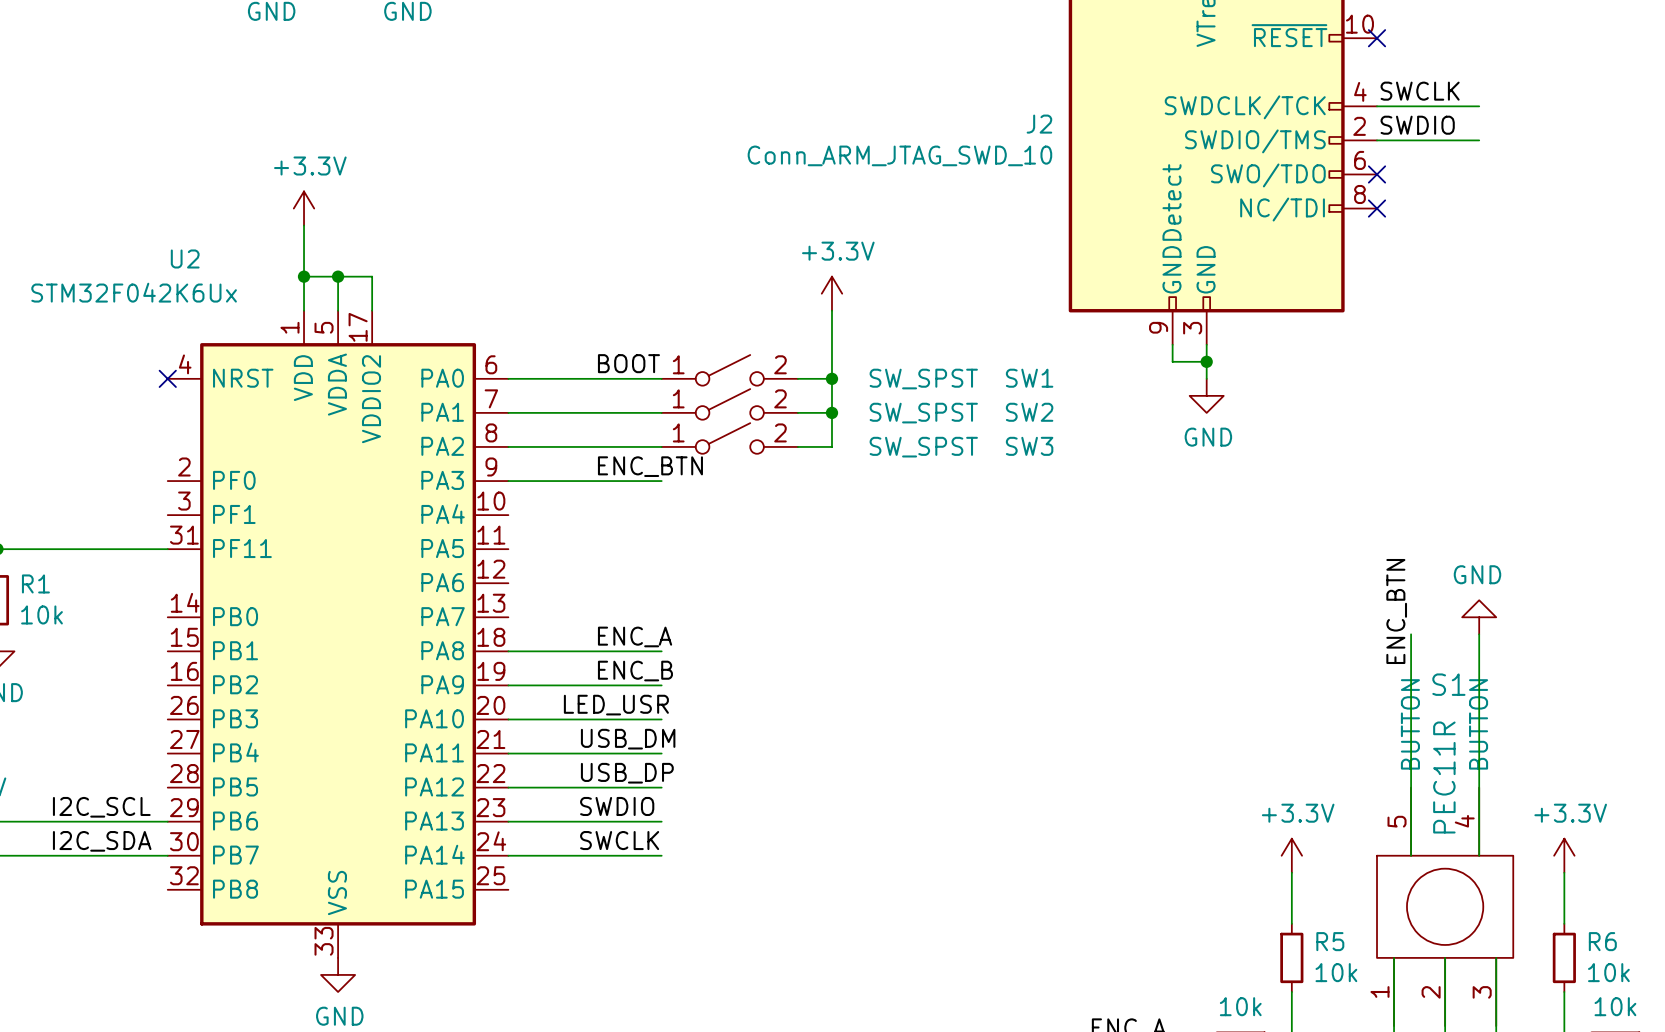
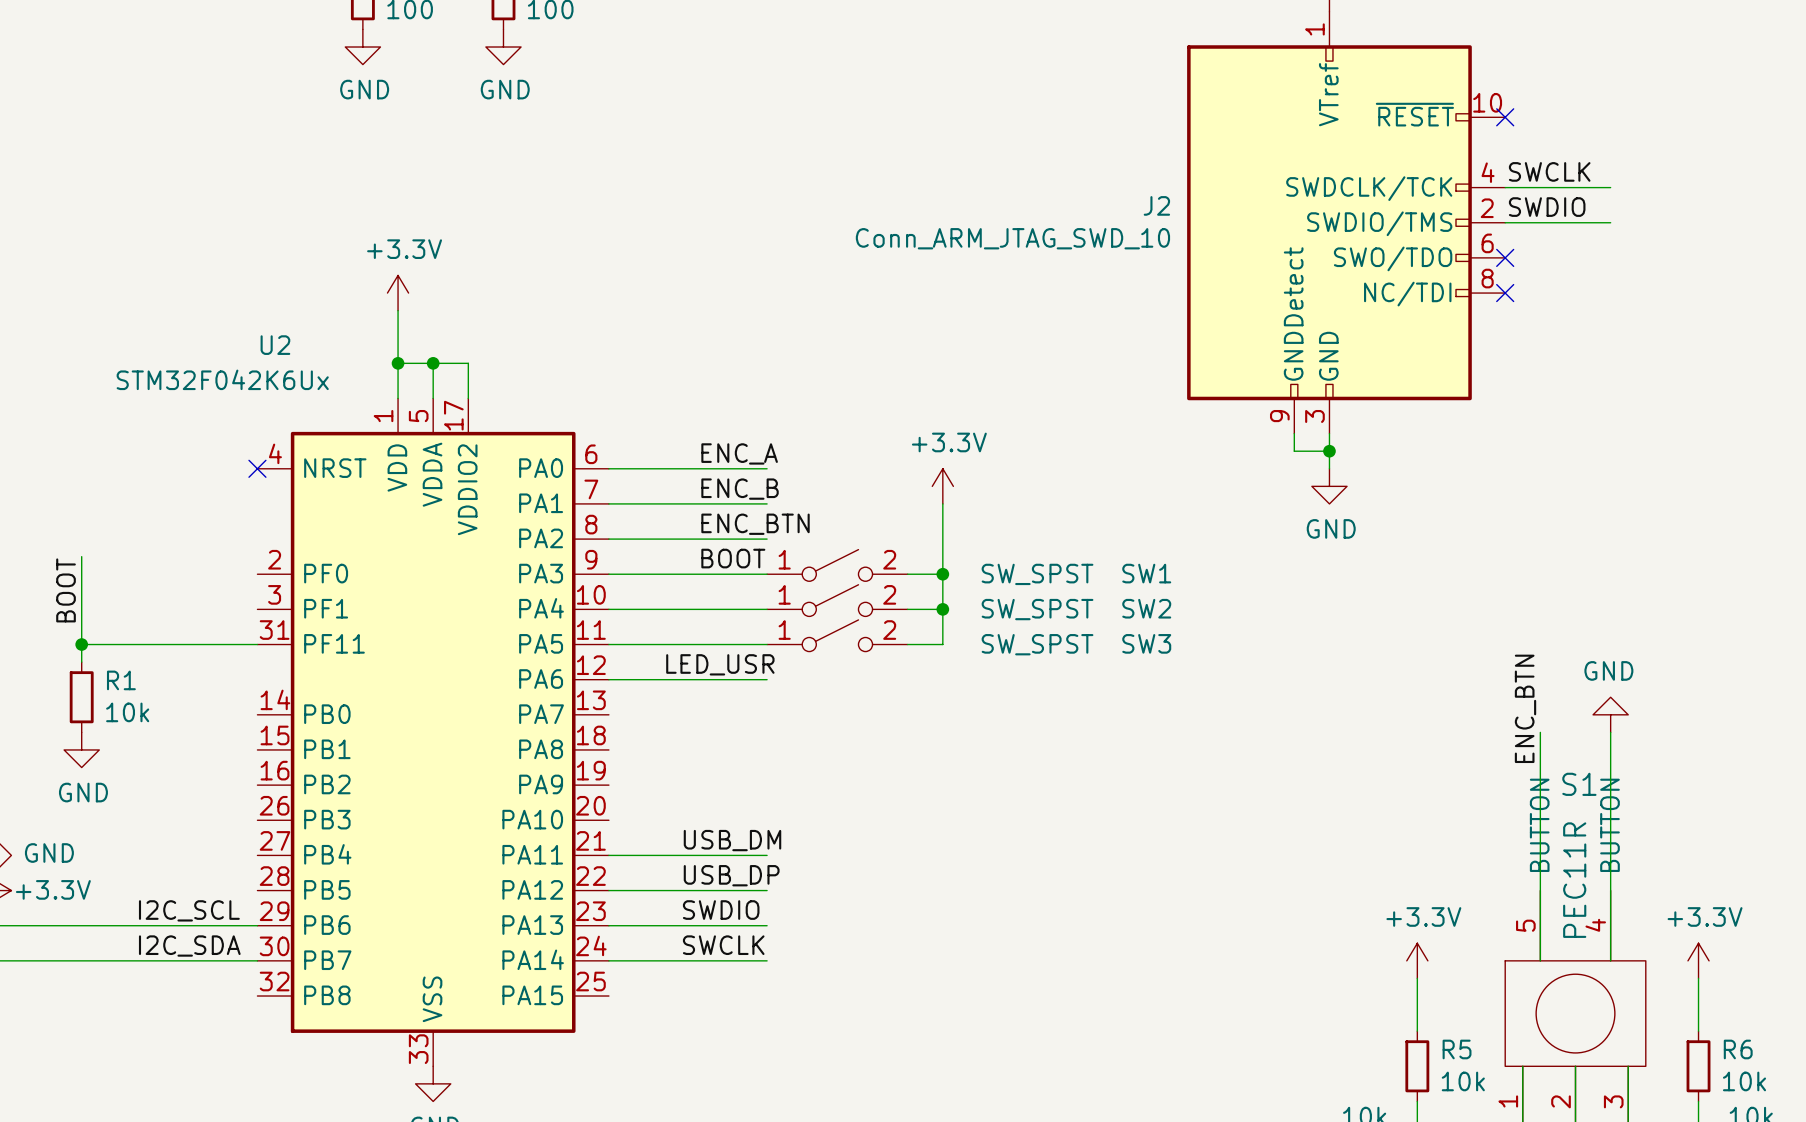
power symbol position: +3.3V (831, 293) -> +3.3V (942, 486)
wire: (831, 310) (831, 412) (797, 412) -> none
label: BOOT (628, 363) -> ENC_A (739, 453)
SW1 position: (729, 370) -> (837, 565)
wire: (797, 378) (831, 378) -> (907, 609) (942, 609)
junction: (831, 378) -> none
SW2 position: (729, 404) -> (837, 600)
junction: (831, 412) -> none
label: none -> ENC_BTN (755, 524)
SW3 position: (729, 438) -> (837, 635)
wire: (797, 446) (831, 446) -> (907, 644) (942, 644) (942, 539)
label: ENC_BTN (650, 466) -> BOOT (733, 558)
wire: none -> (907, 574) (942, 574)
junction: none -> (942, 574)
junction: none -> (942, 609)
label: ENC_A (635, 636) -> none
wire: (508, 651) (661, 651) -> (608, 609) (767, 609)
label position: ENC_B (635, 671) -> ENC_B (740, 489)
wire: (508, 685) (661, 685) -> (608, 644) (767, 644)
label position: LED_USR (616, 705) -> LED_USR (720, 664)
wire: (508, 719) (661, 719) -> (608, 679) (767, 679)

